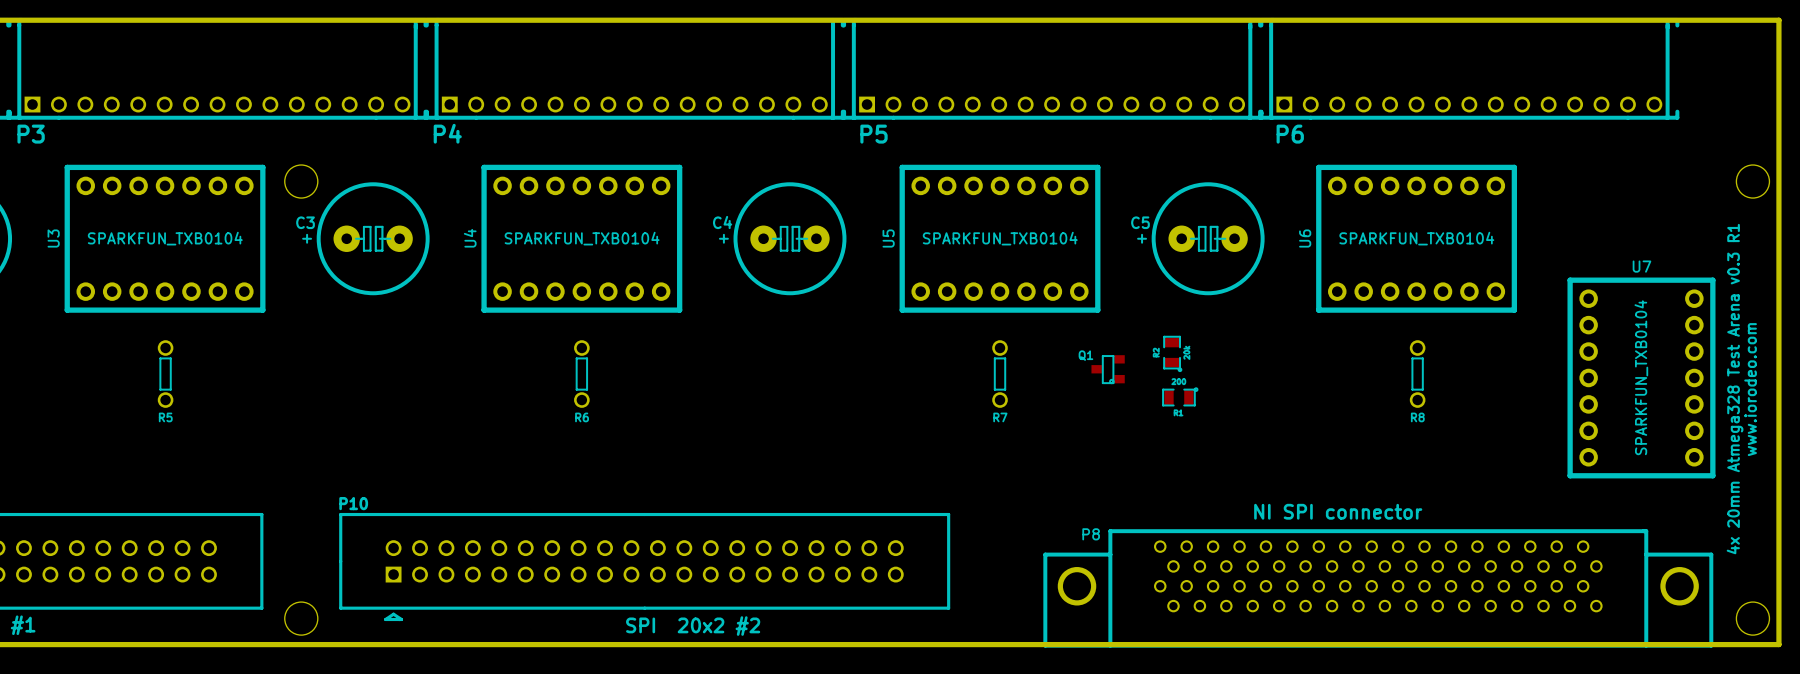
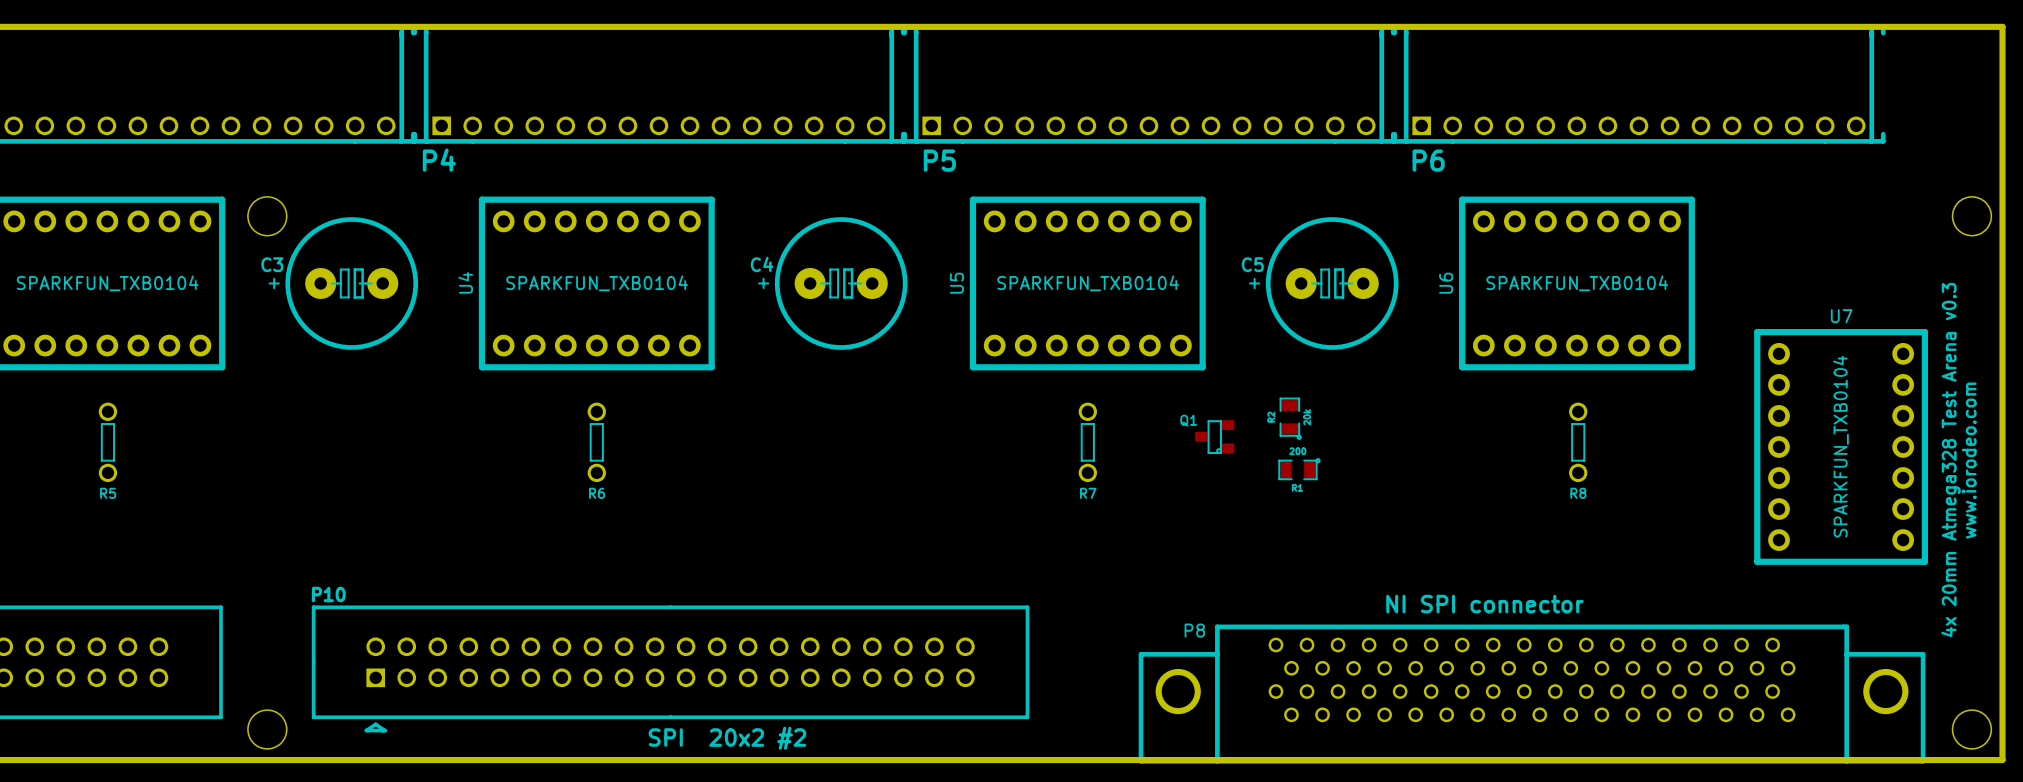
text: 4x 20mm Atmega328 Test Arena v0.3 R1 (1735, 389) -> 4x 20mm Atmega328 Test Arena v0.3 (1950, 460)

